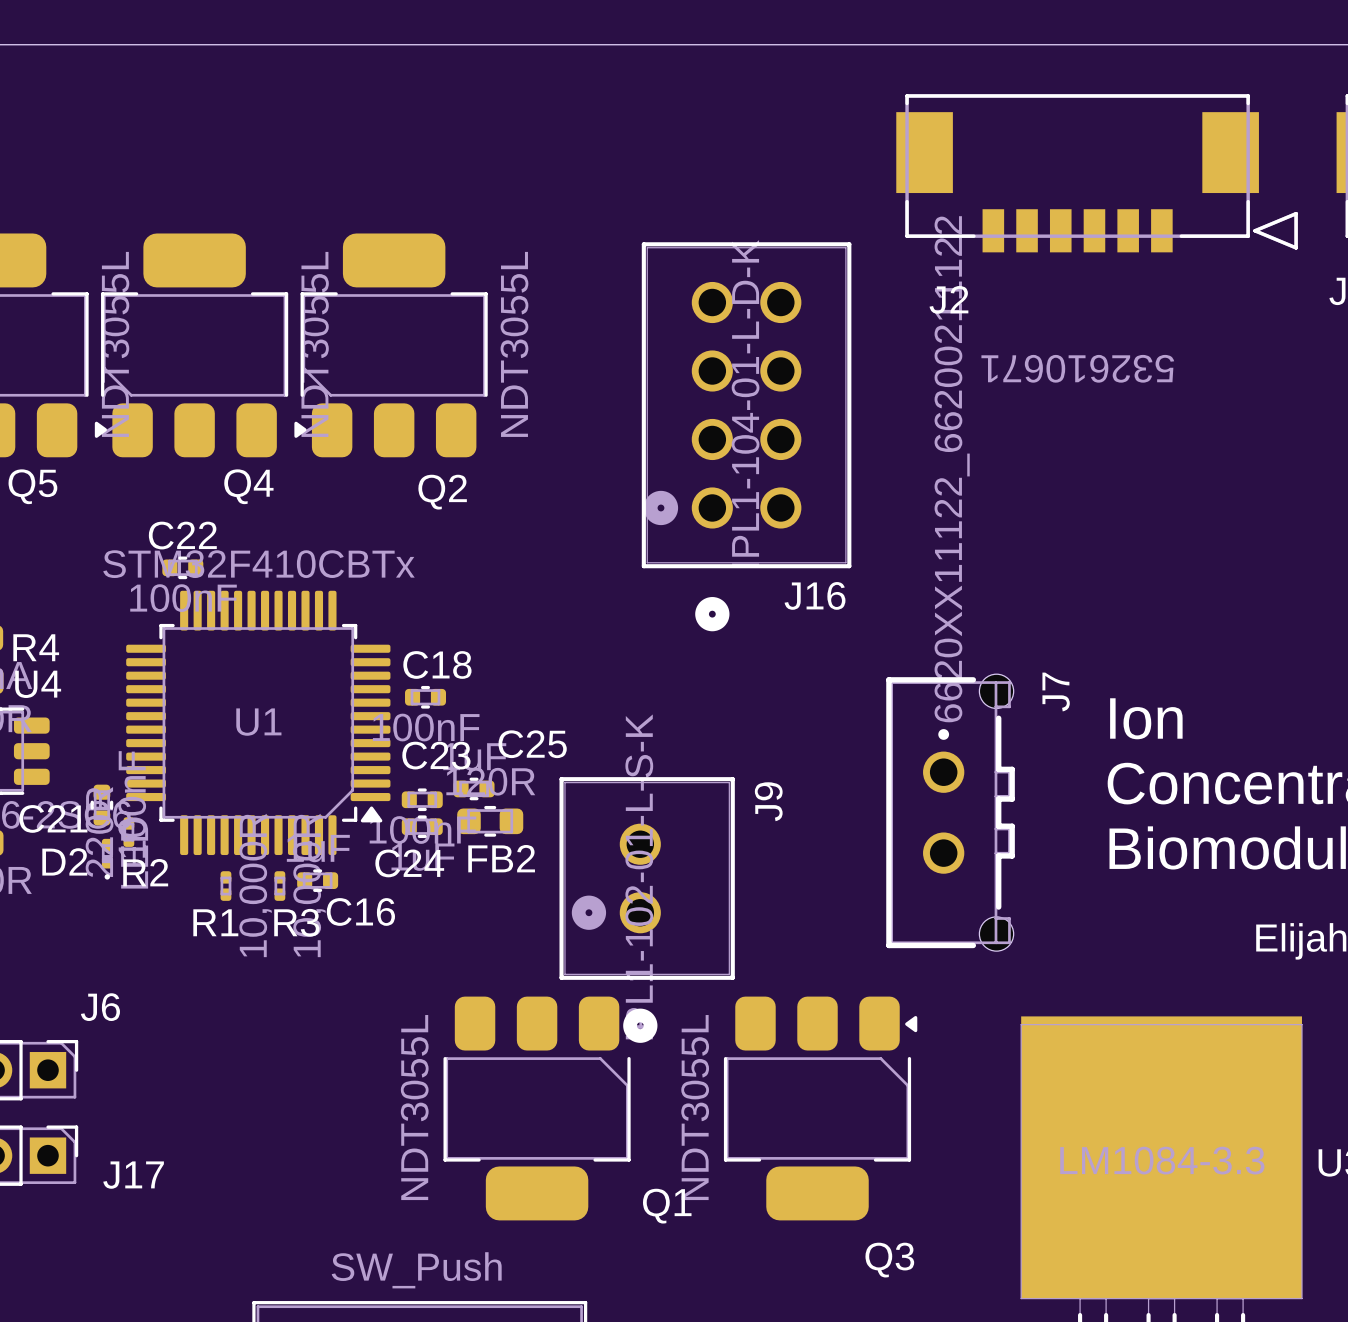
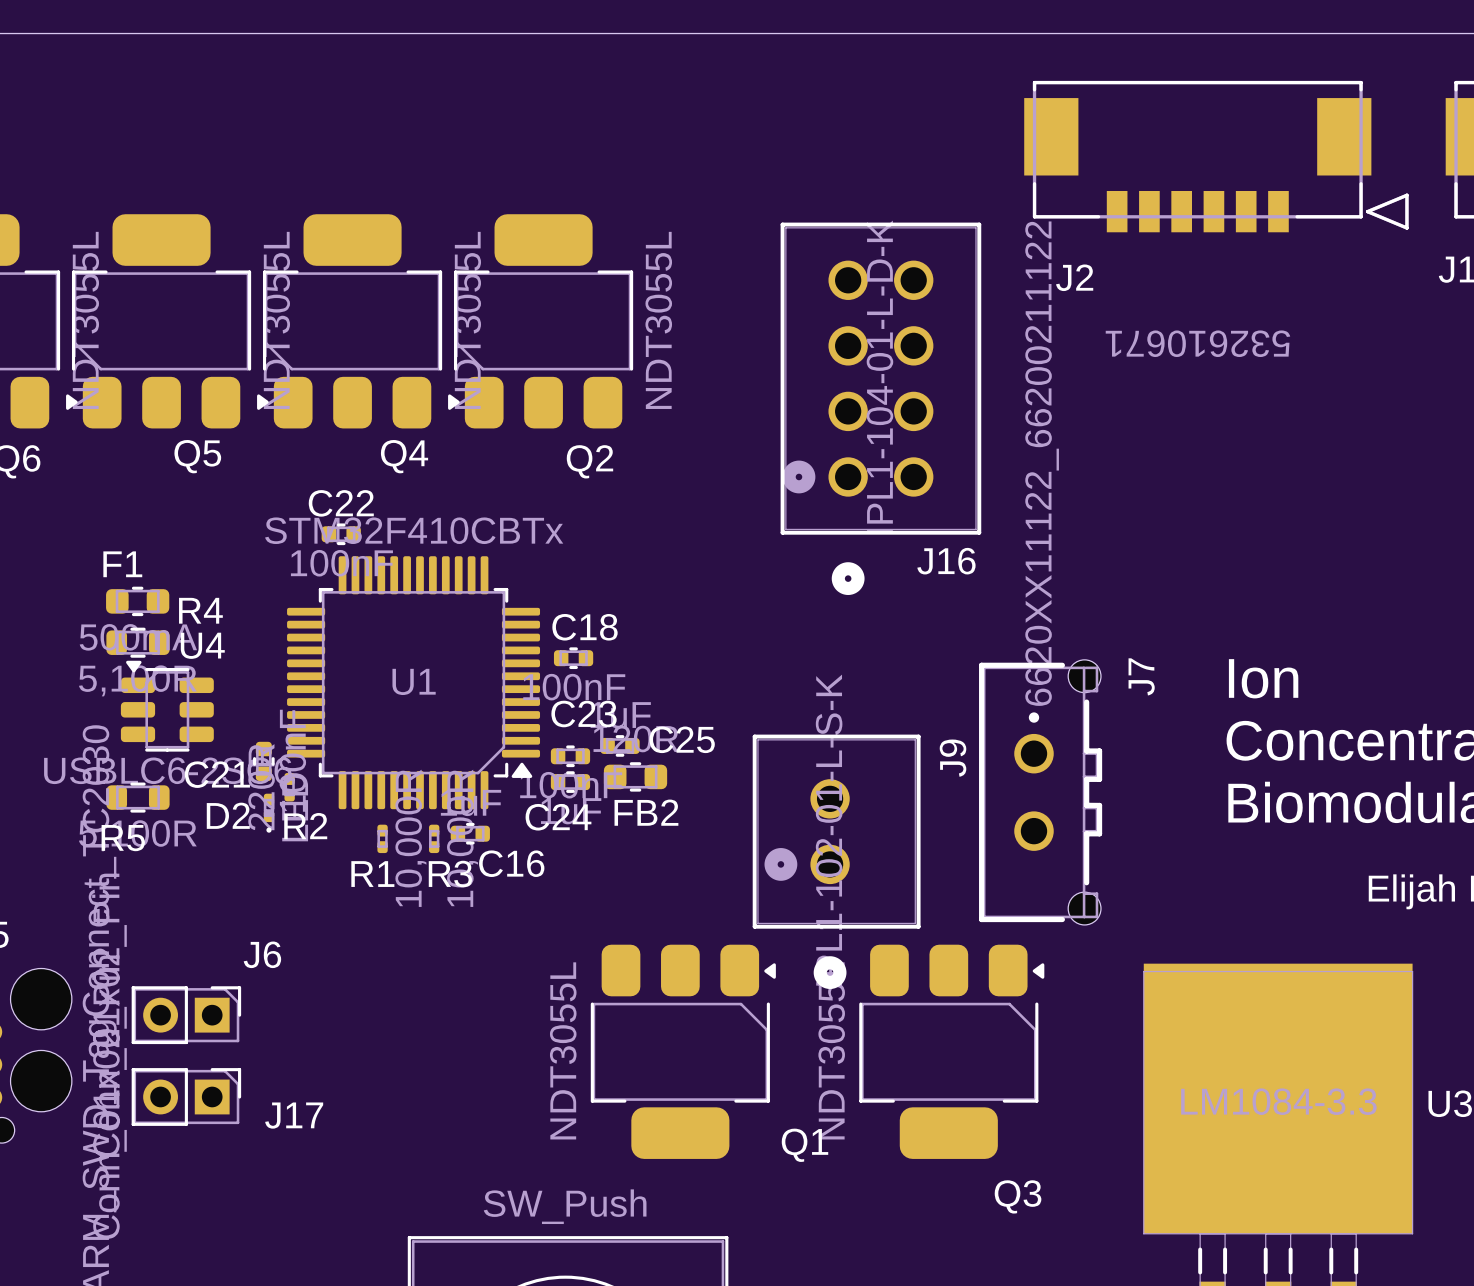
C25 name position: C25 (532, 744) -> C25 (682, 739)
J7 position: (950, 812) -> (1040, 792)
J9 position: (647, 909) -> (836, 861)

